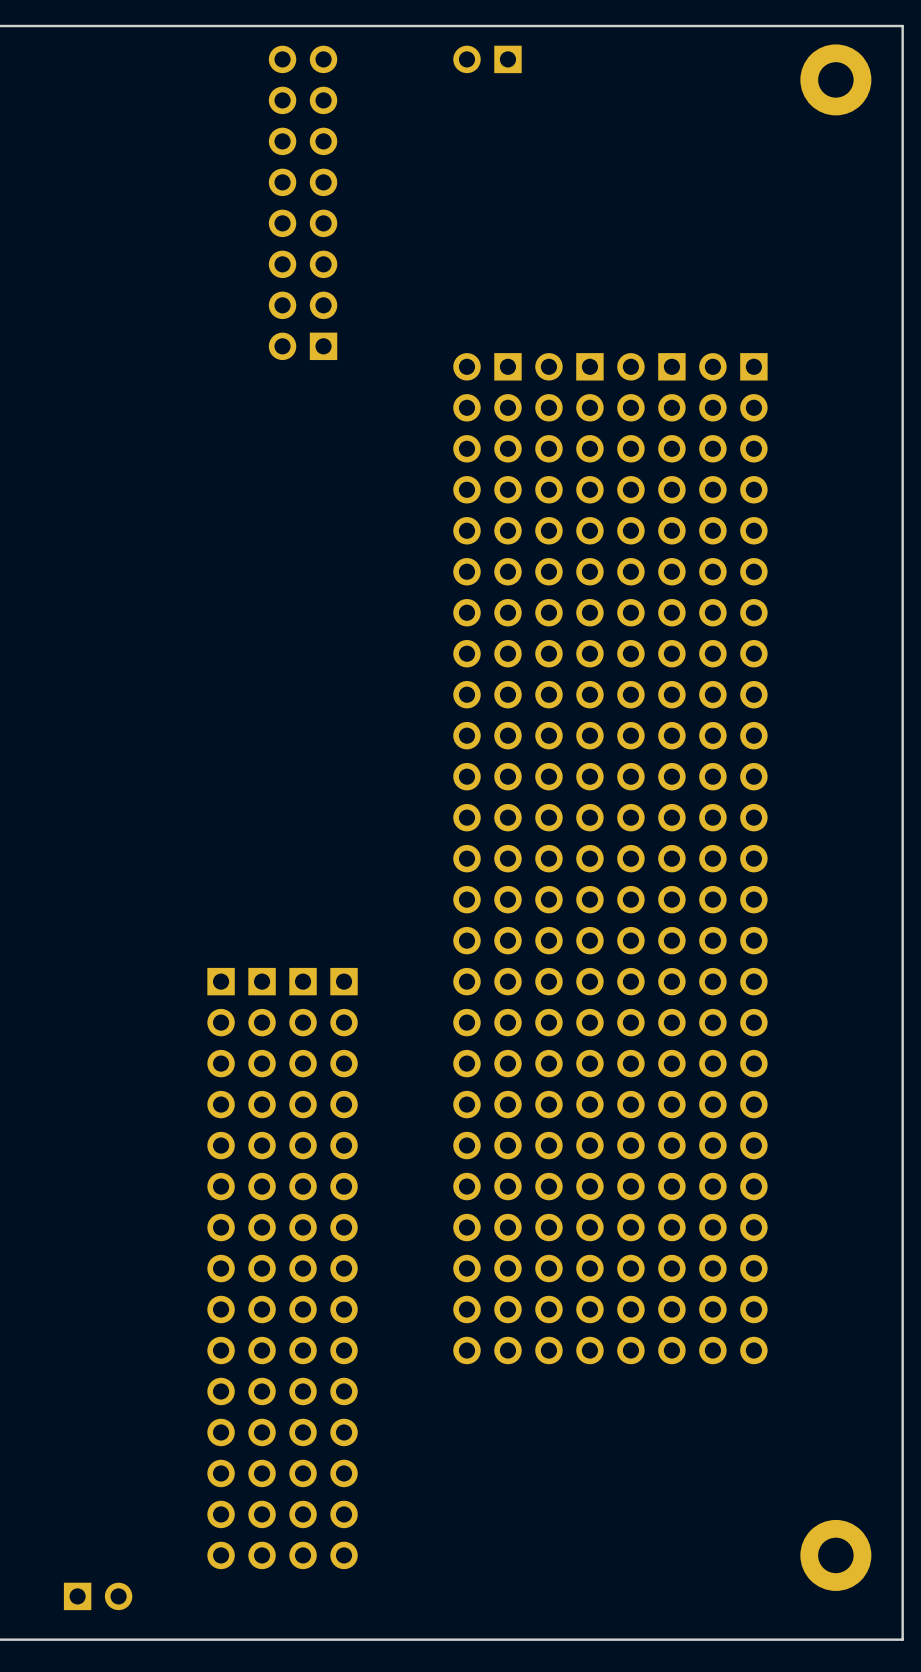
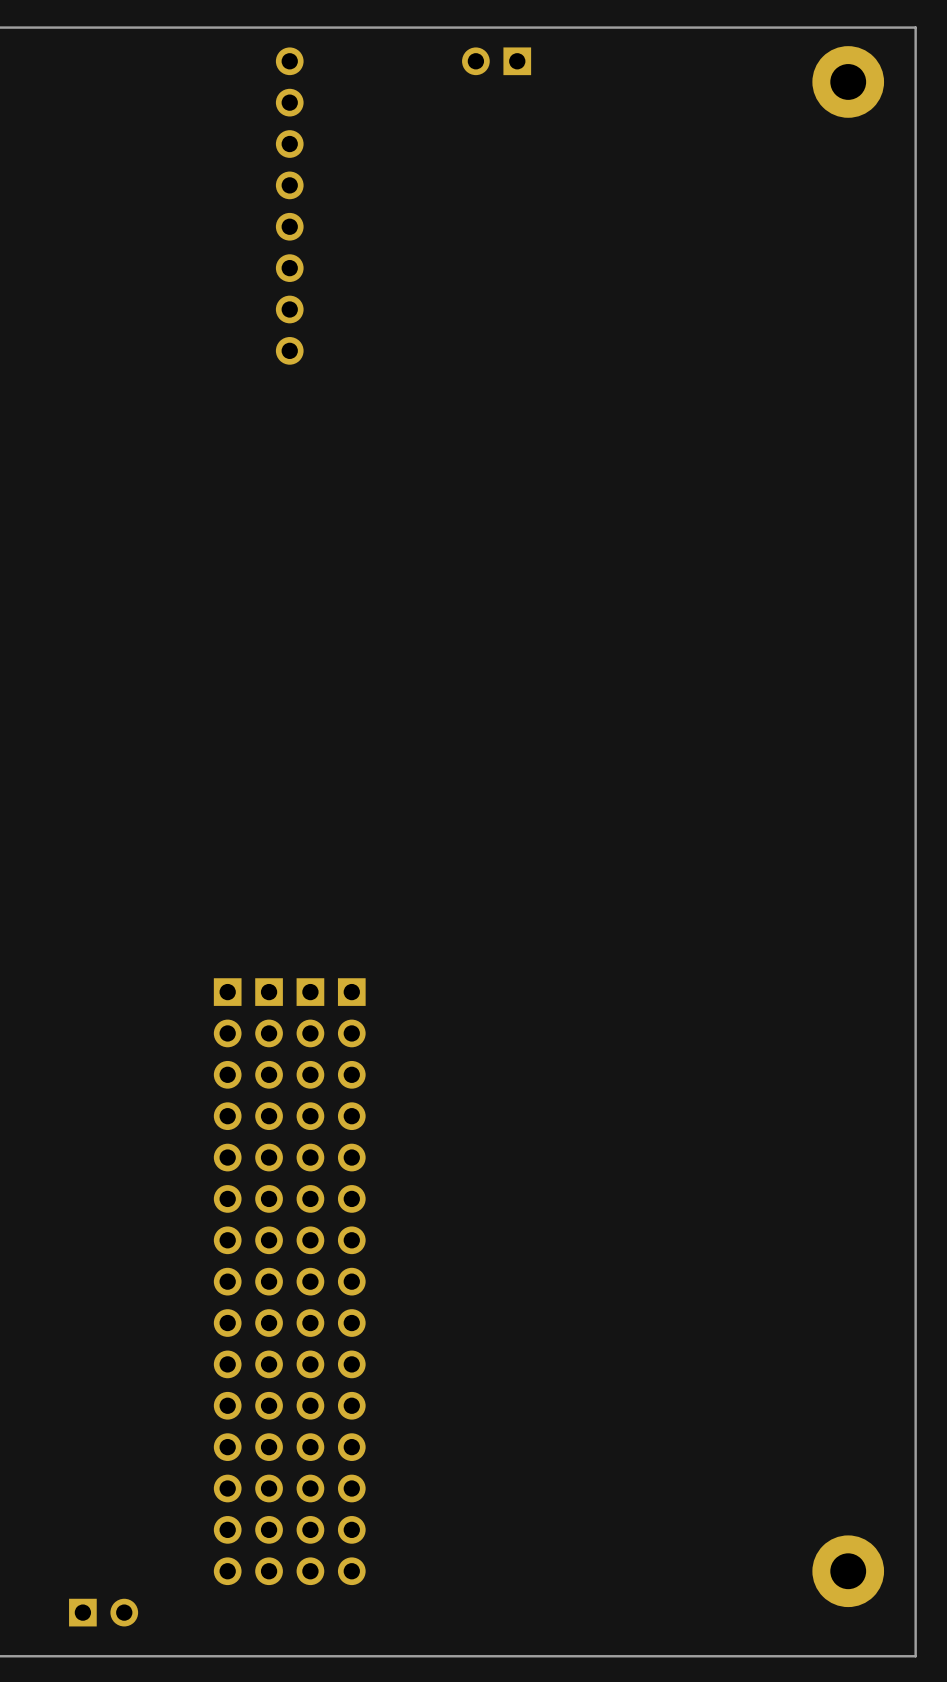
part: (323, 202) -> none
part: (487, 858) -> none
part: (569, 858) -> none
part: (651, 858) -> none
part: (733, 858) -> none

